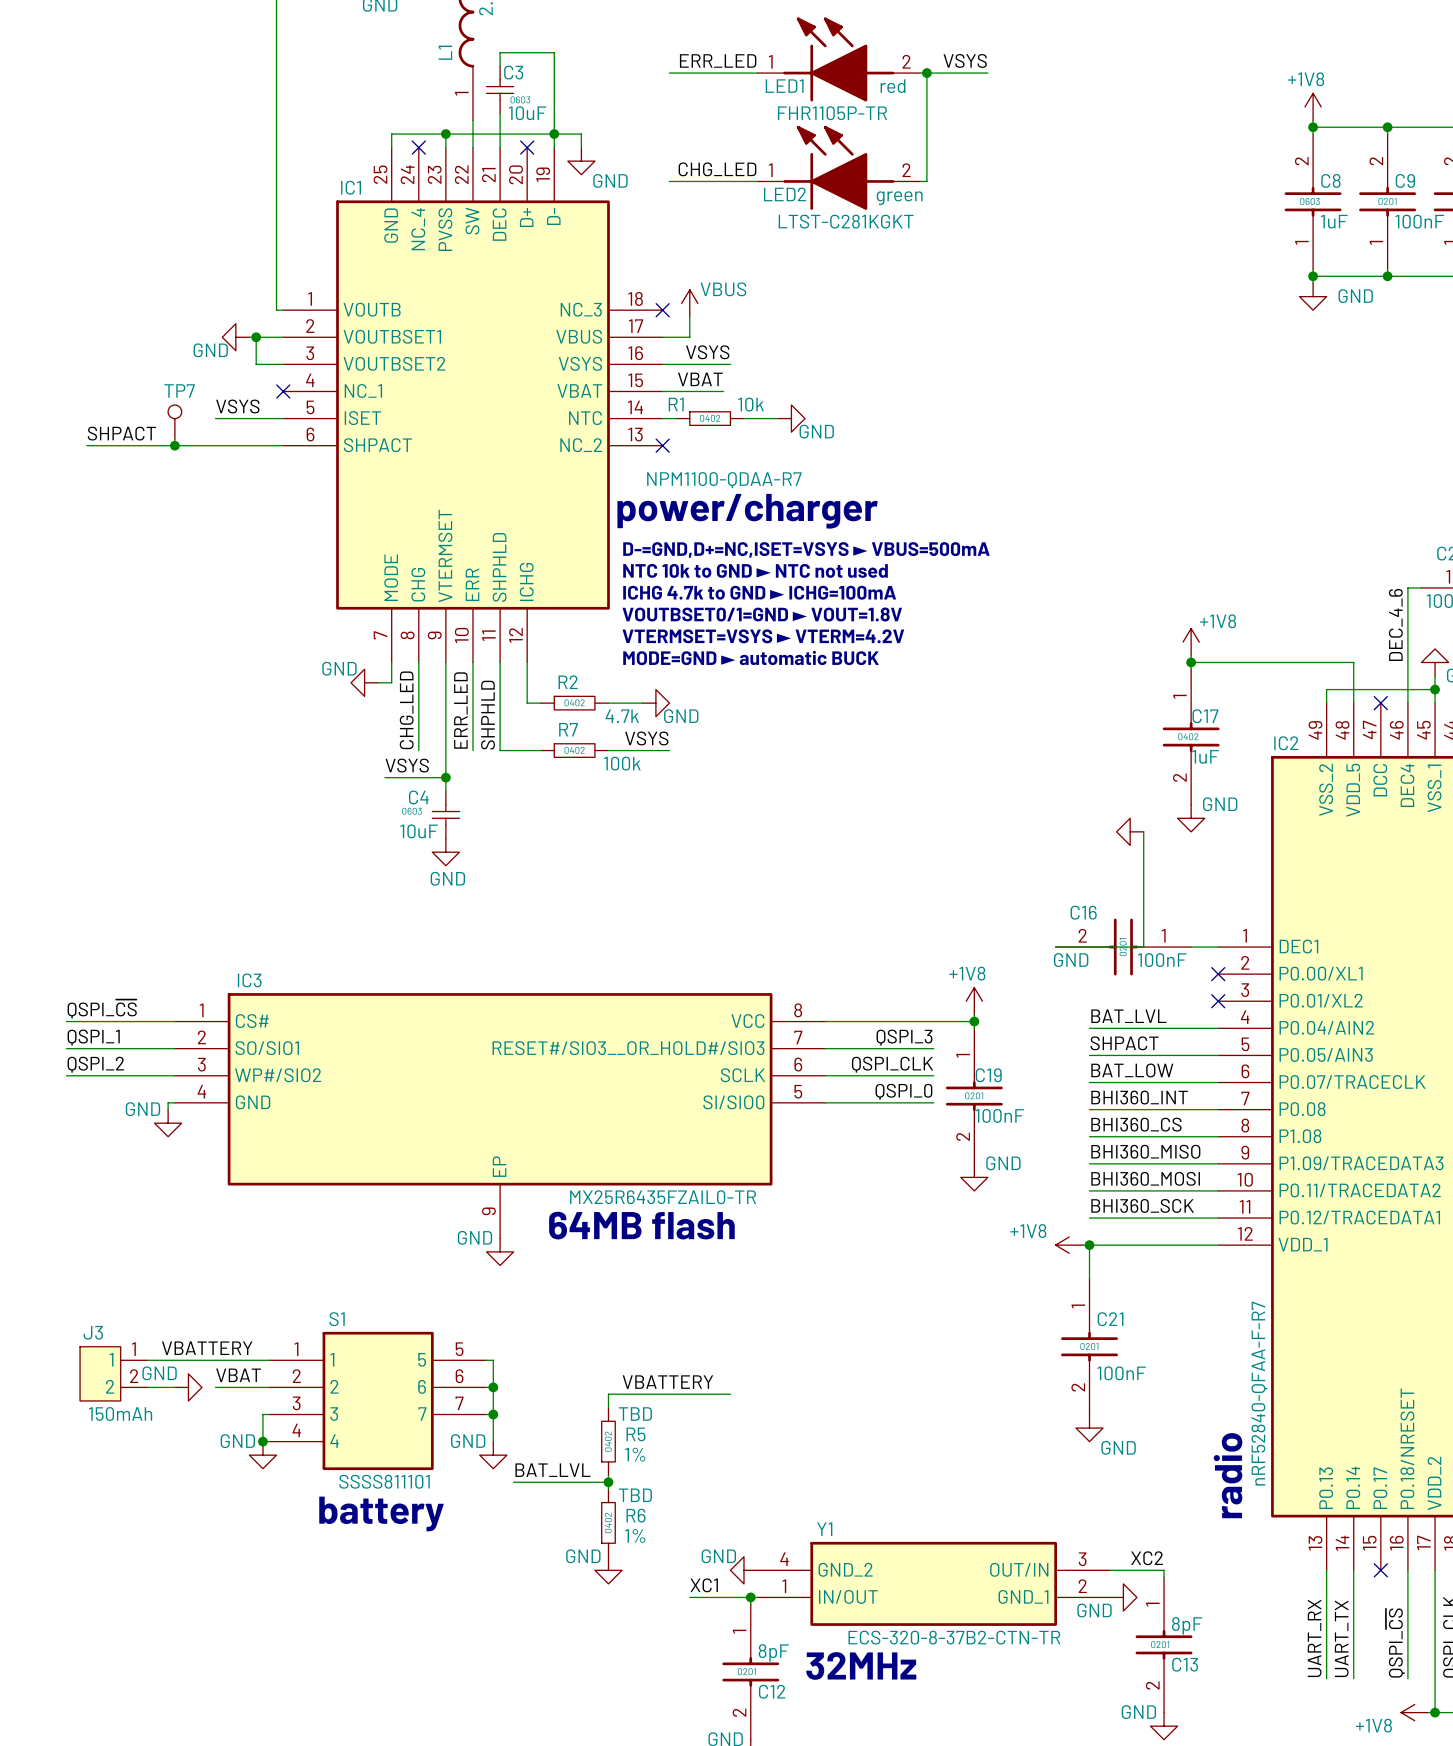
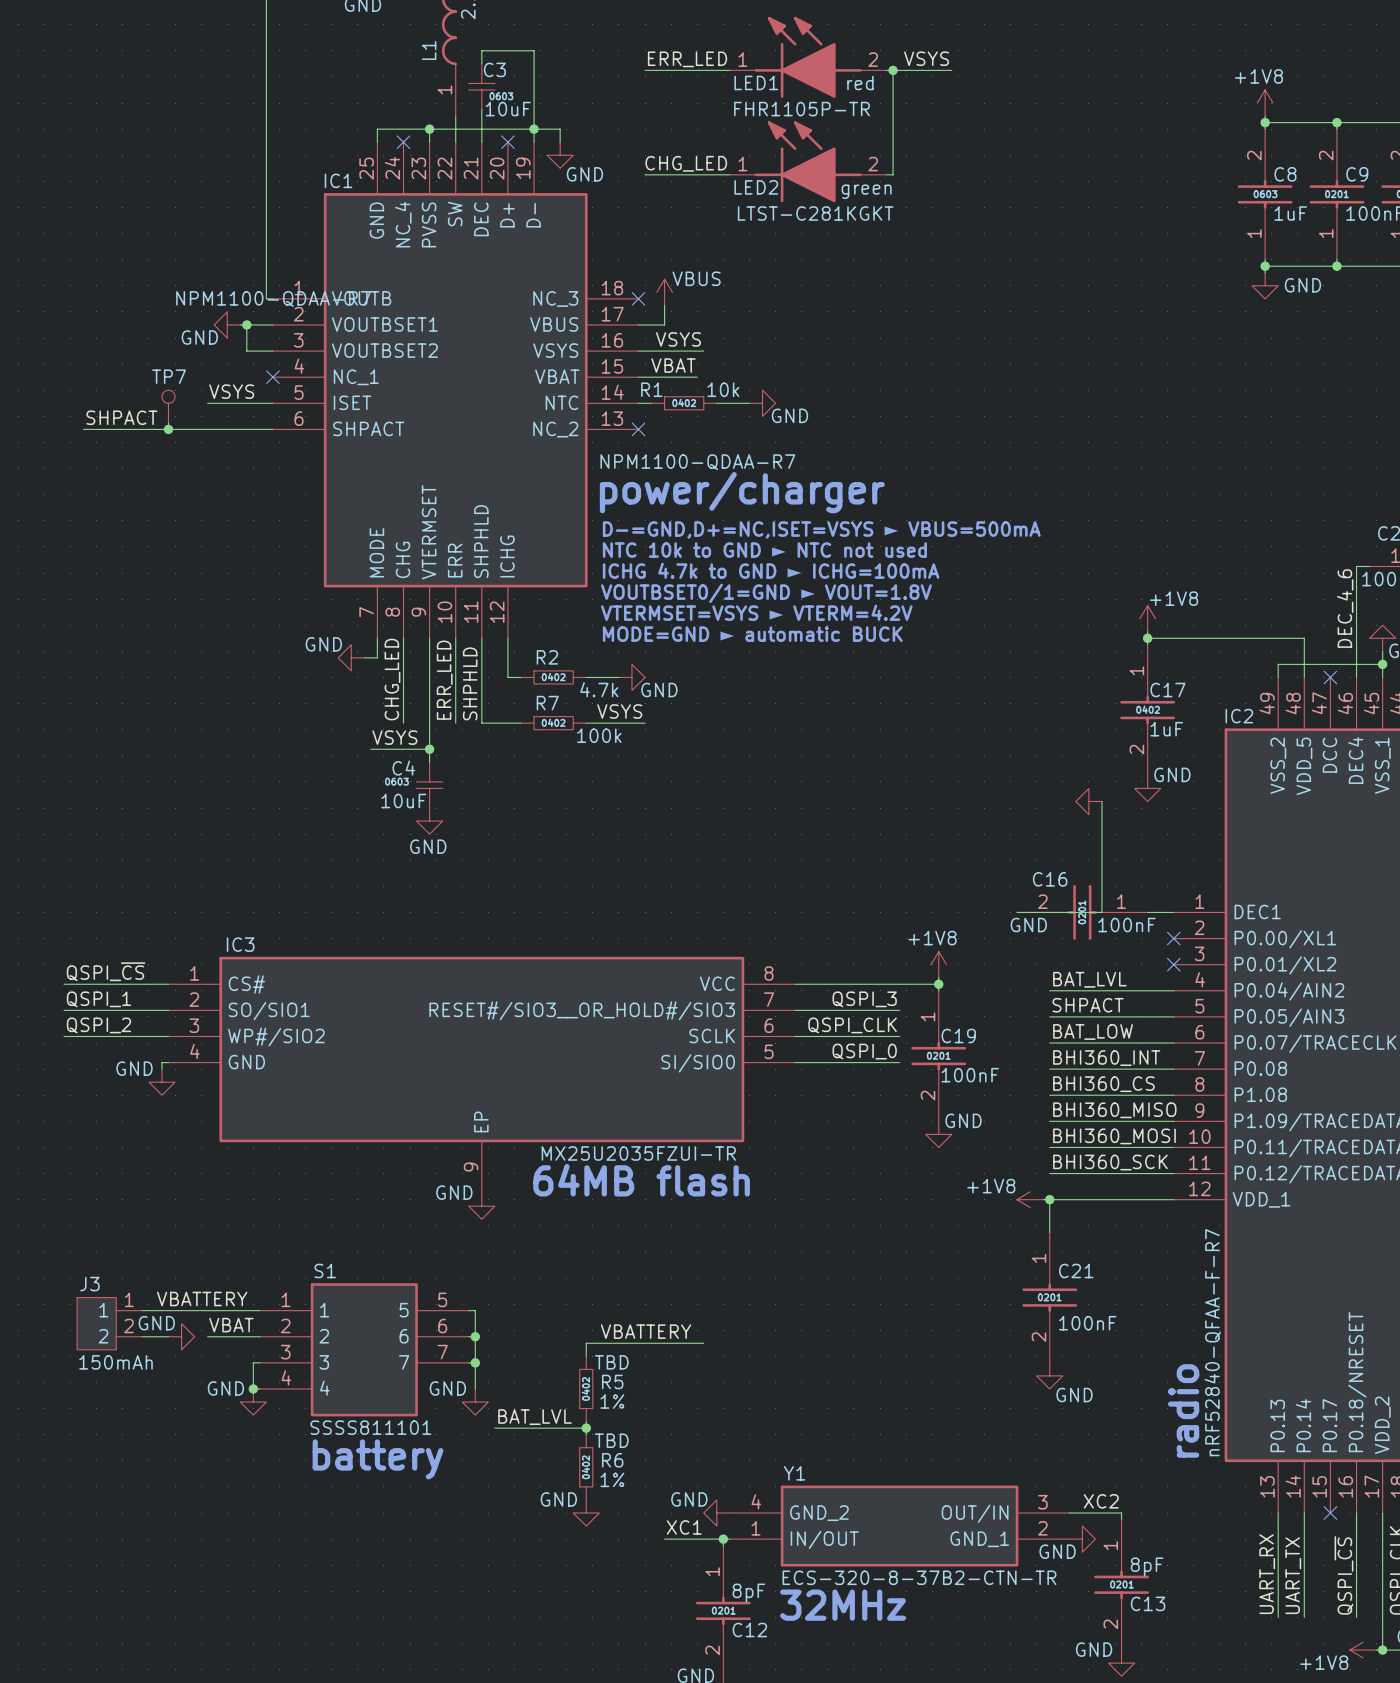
IC1 text: none -> NPM1100-QDAA-R7 (273, 298)
IC3 value: MX25R6435FZAIL0-TR (663, 1197) -> MX25U2035FZUI-TR (638, 1153)

